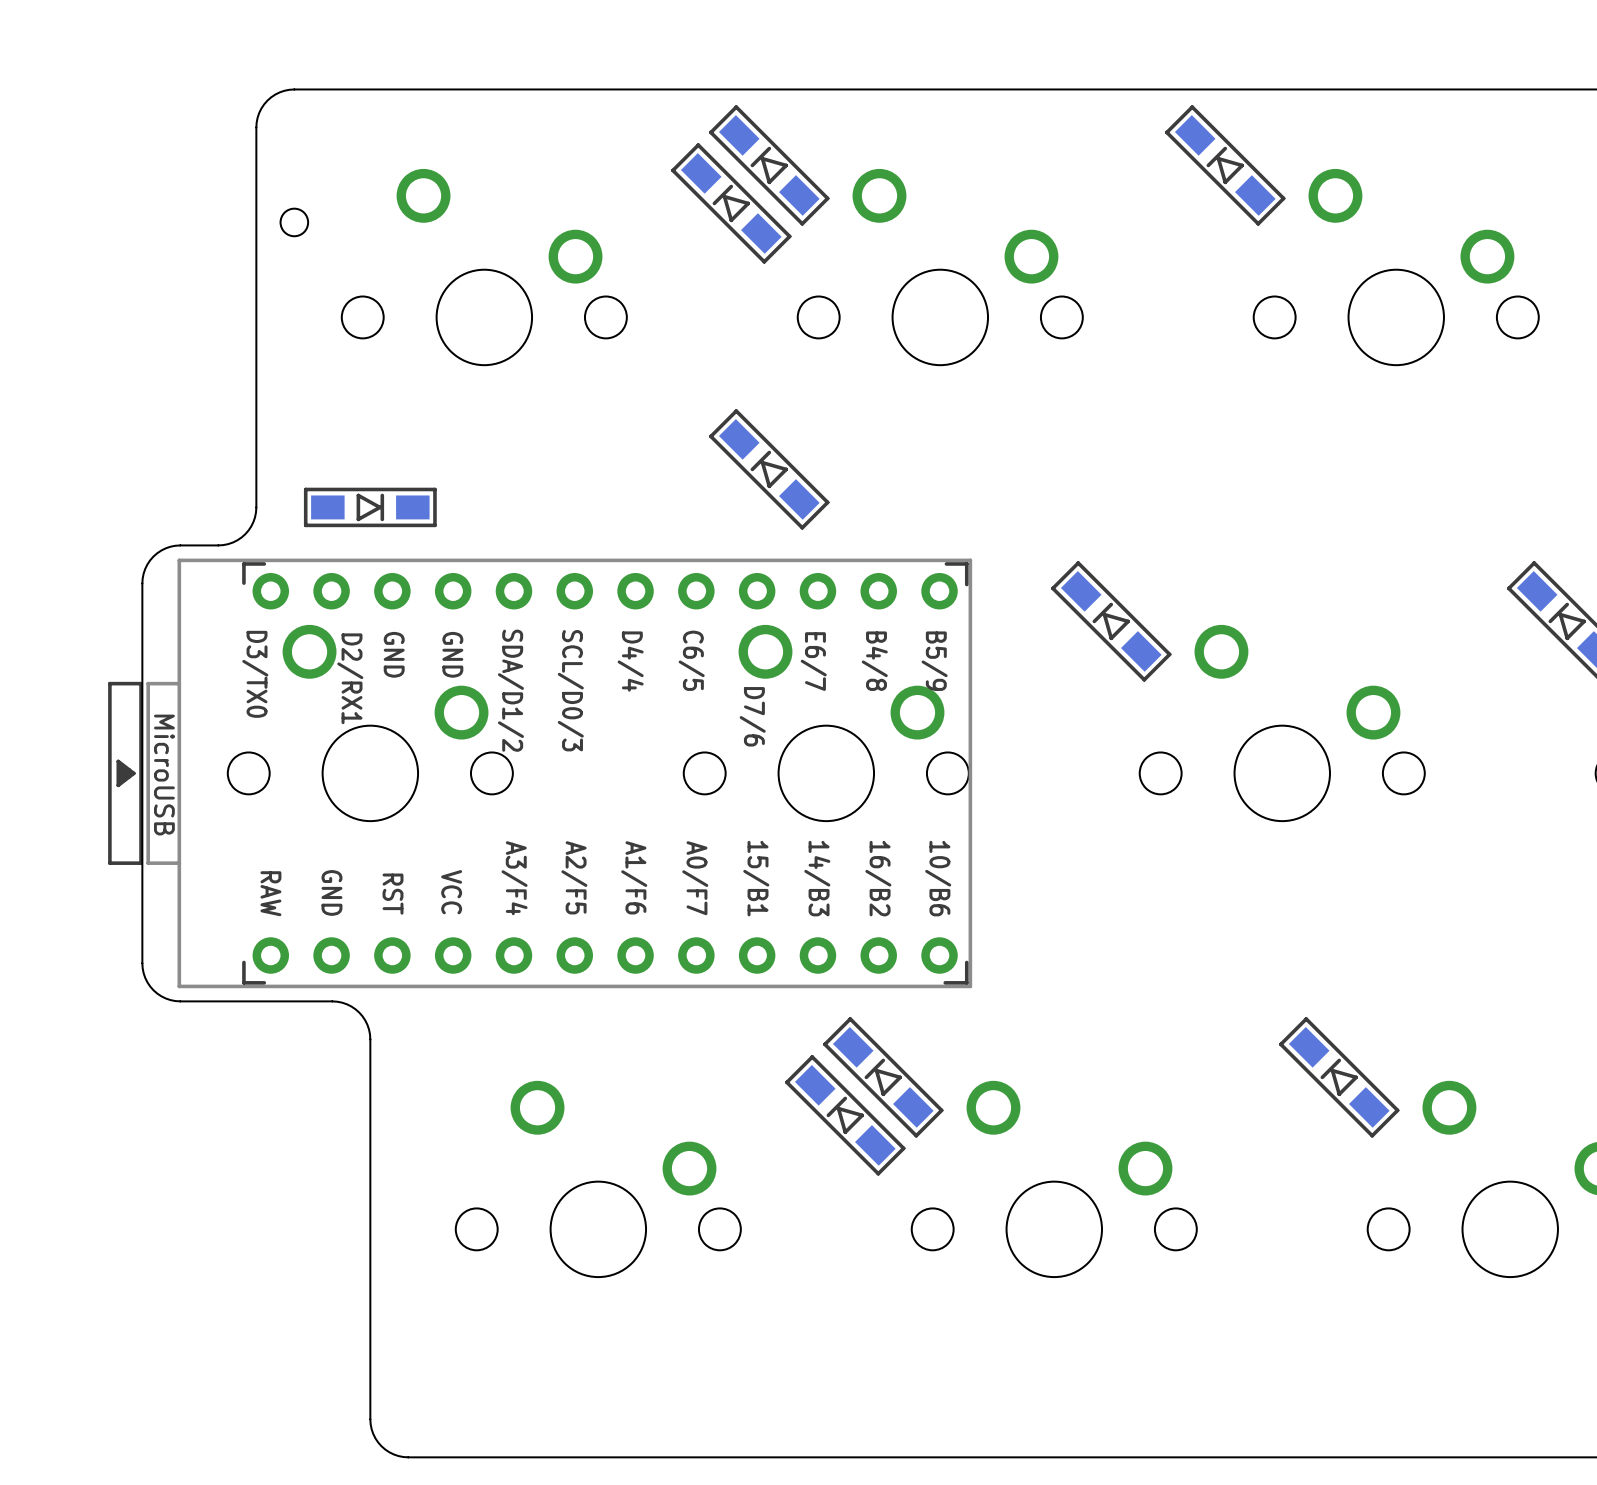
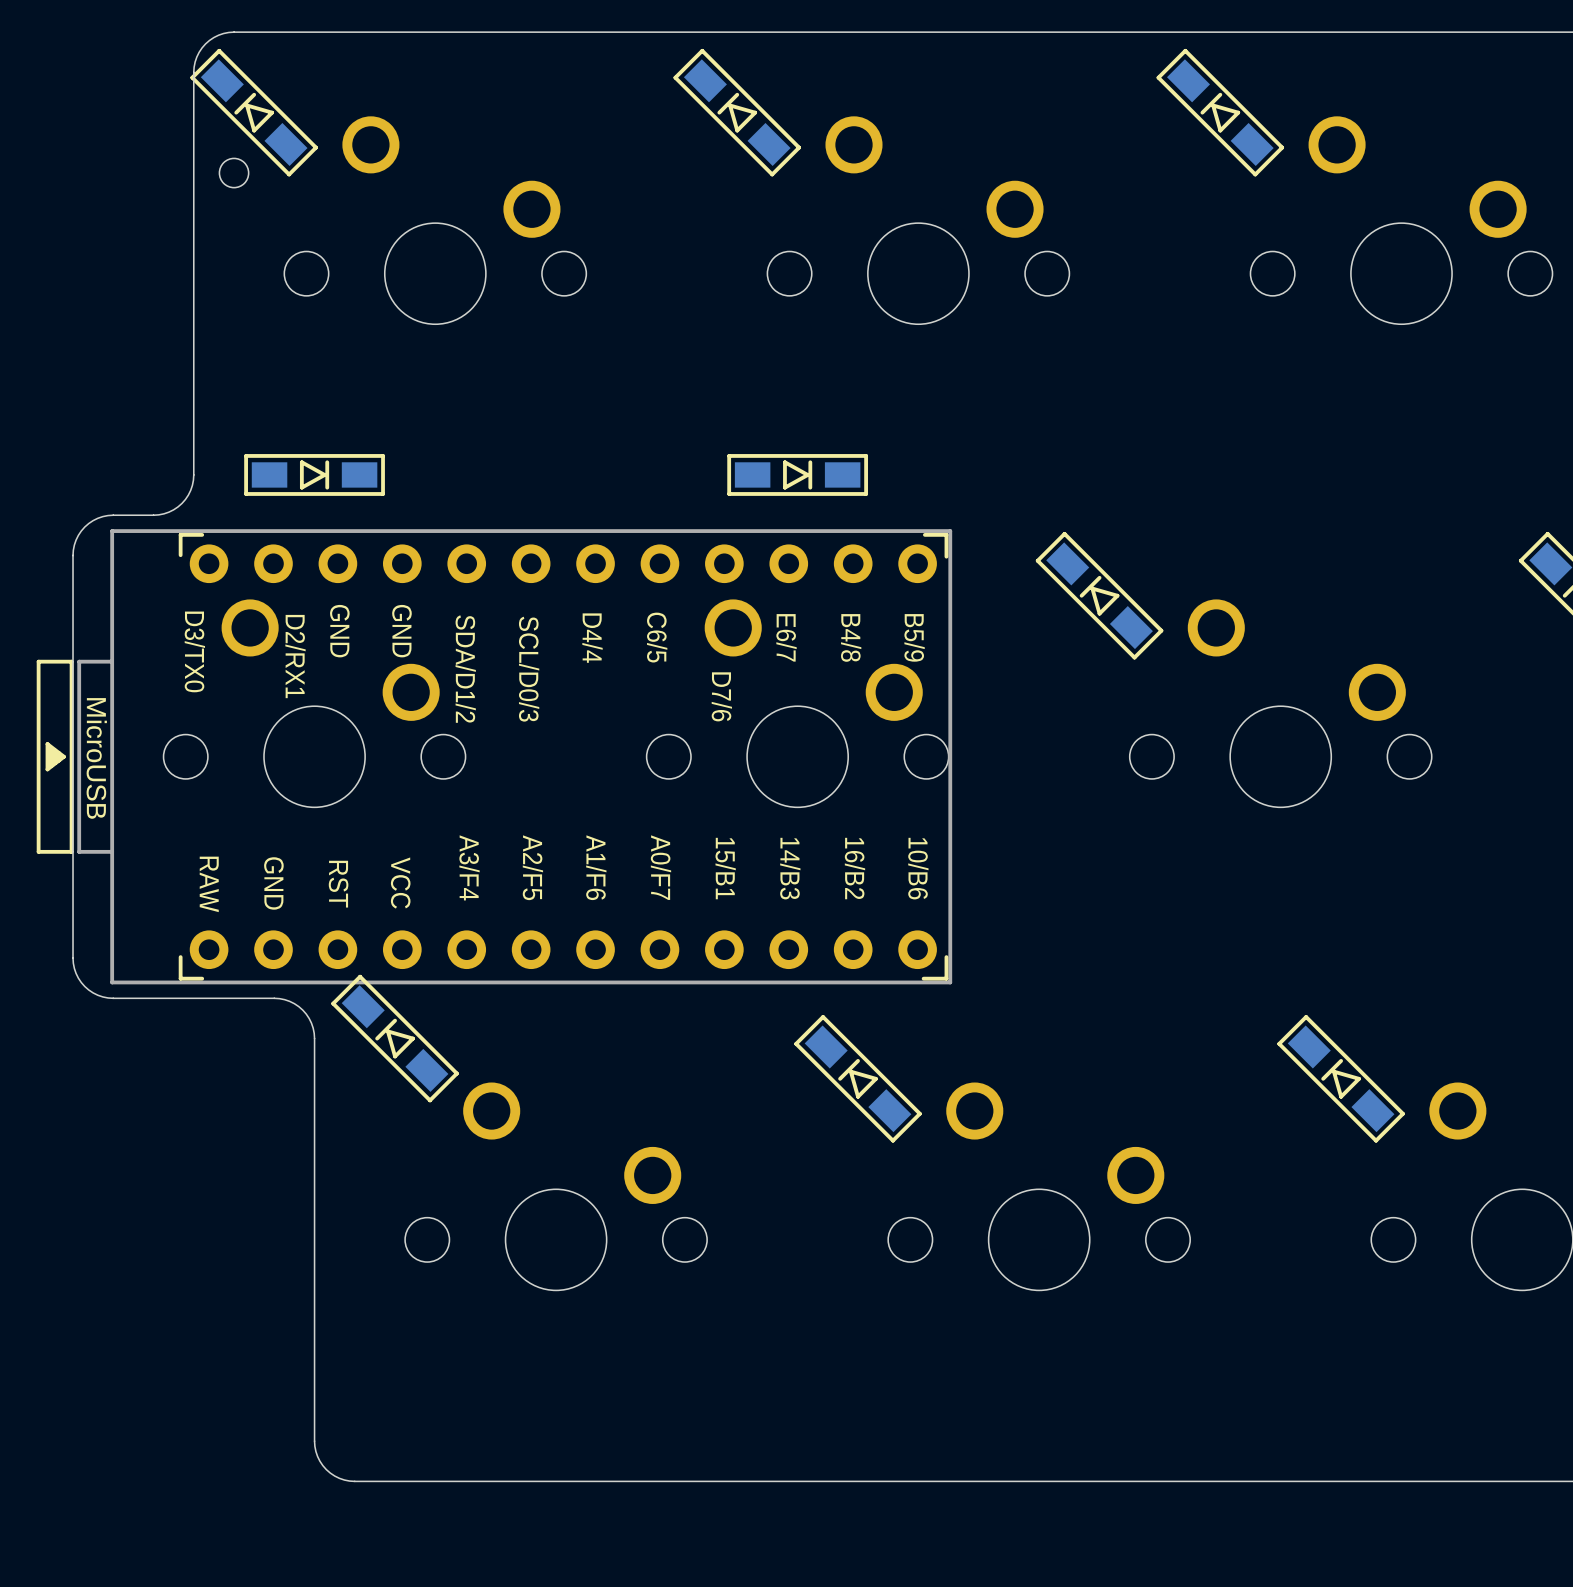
part: none -> (254, 112)
part: (731, 203) -> none
part: (769, 469) -> none
part: none -> (797, 474)
part: none -> (395, 1038)
part: (845, 1115) -> none

